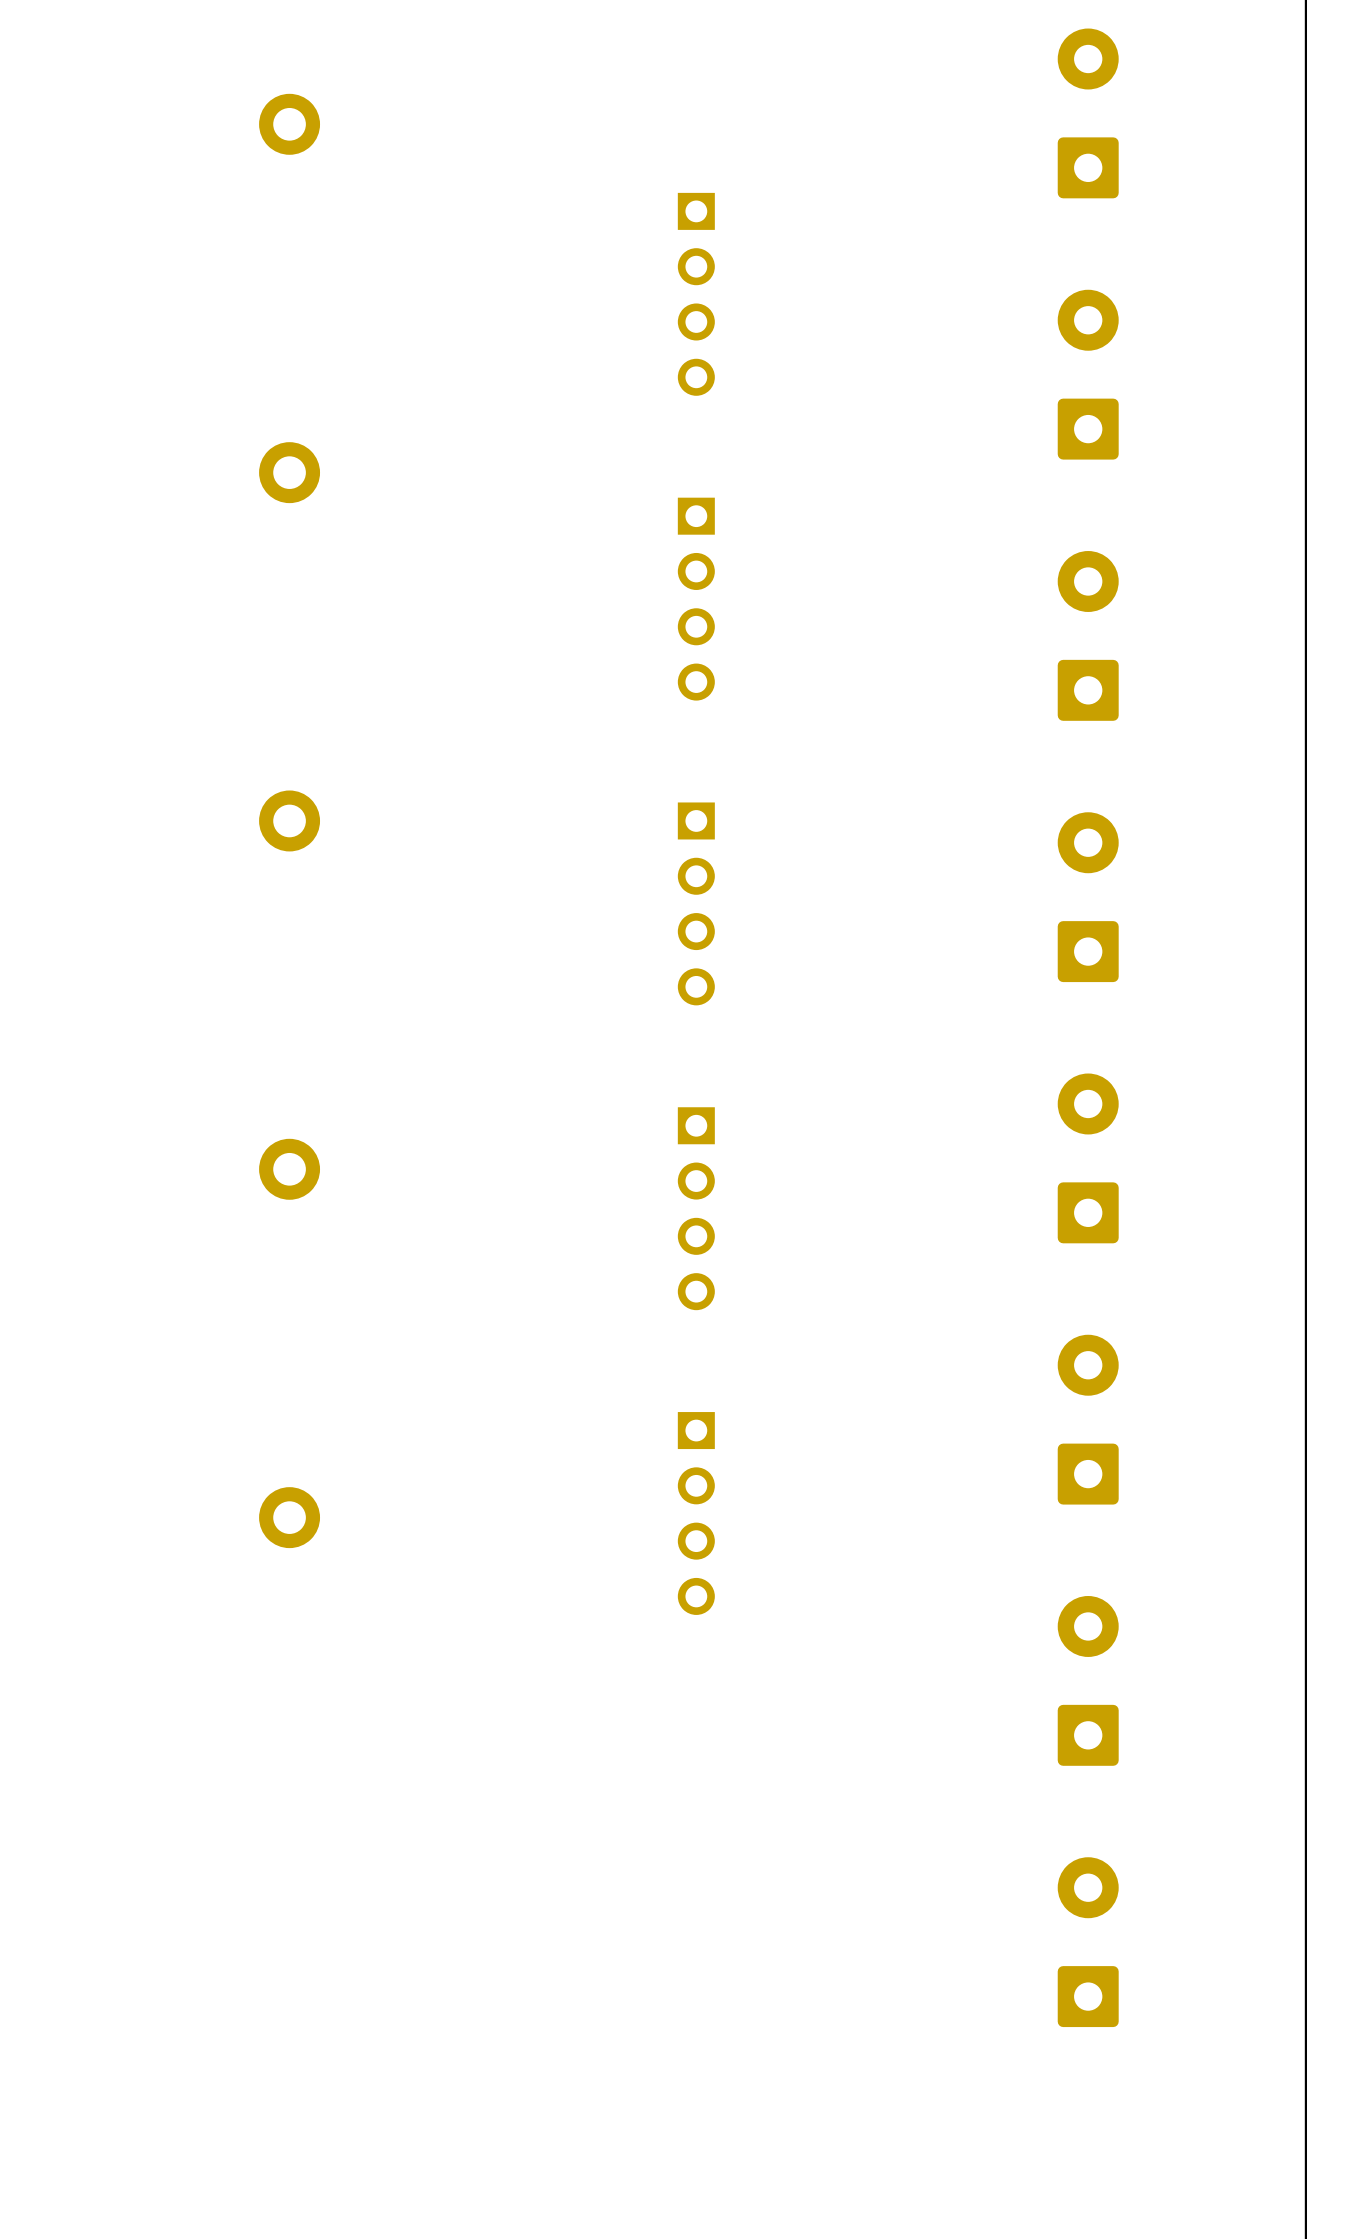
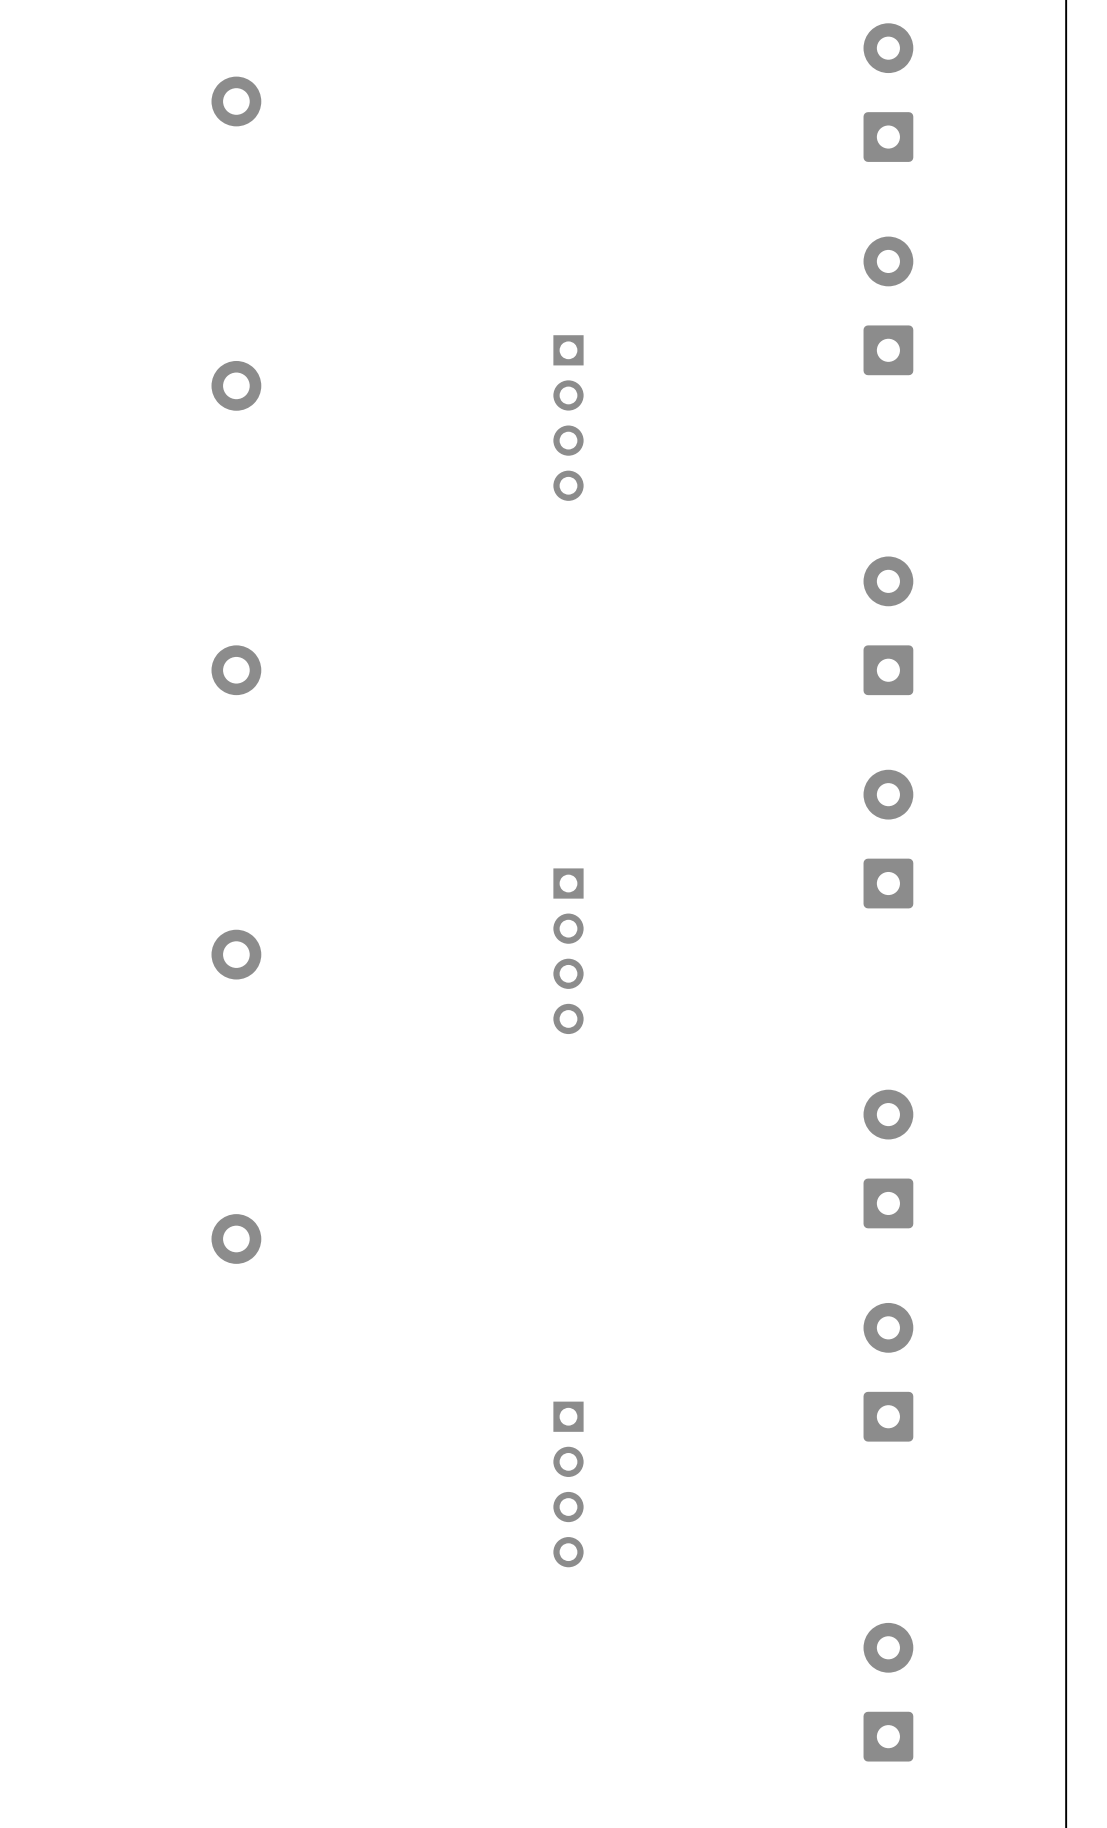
part: (696, 294) -> none
part position: (696, 599) -> (568, 418)
part: (1088, 635) -> none
part: none -> (888, 625)
part: (1088, 897) -> none
part: (696, 903) -> none
part: none -> (888, 839)
part: (1088, 1158) -> none
part position: (696, 1208) -> (568, 951)
part: (696, 1513) -> none
part: none -> (568, 1484)
part position: (1088, 1942) -> (888, 1692)

